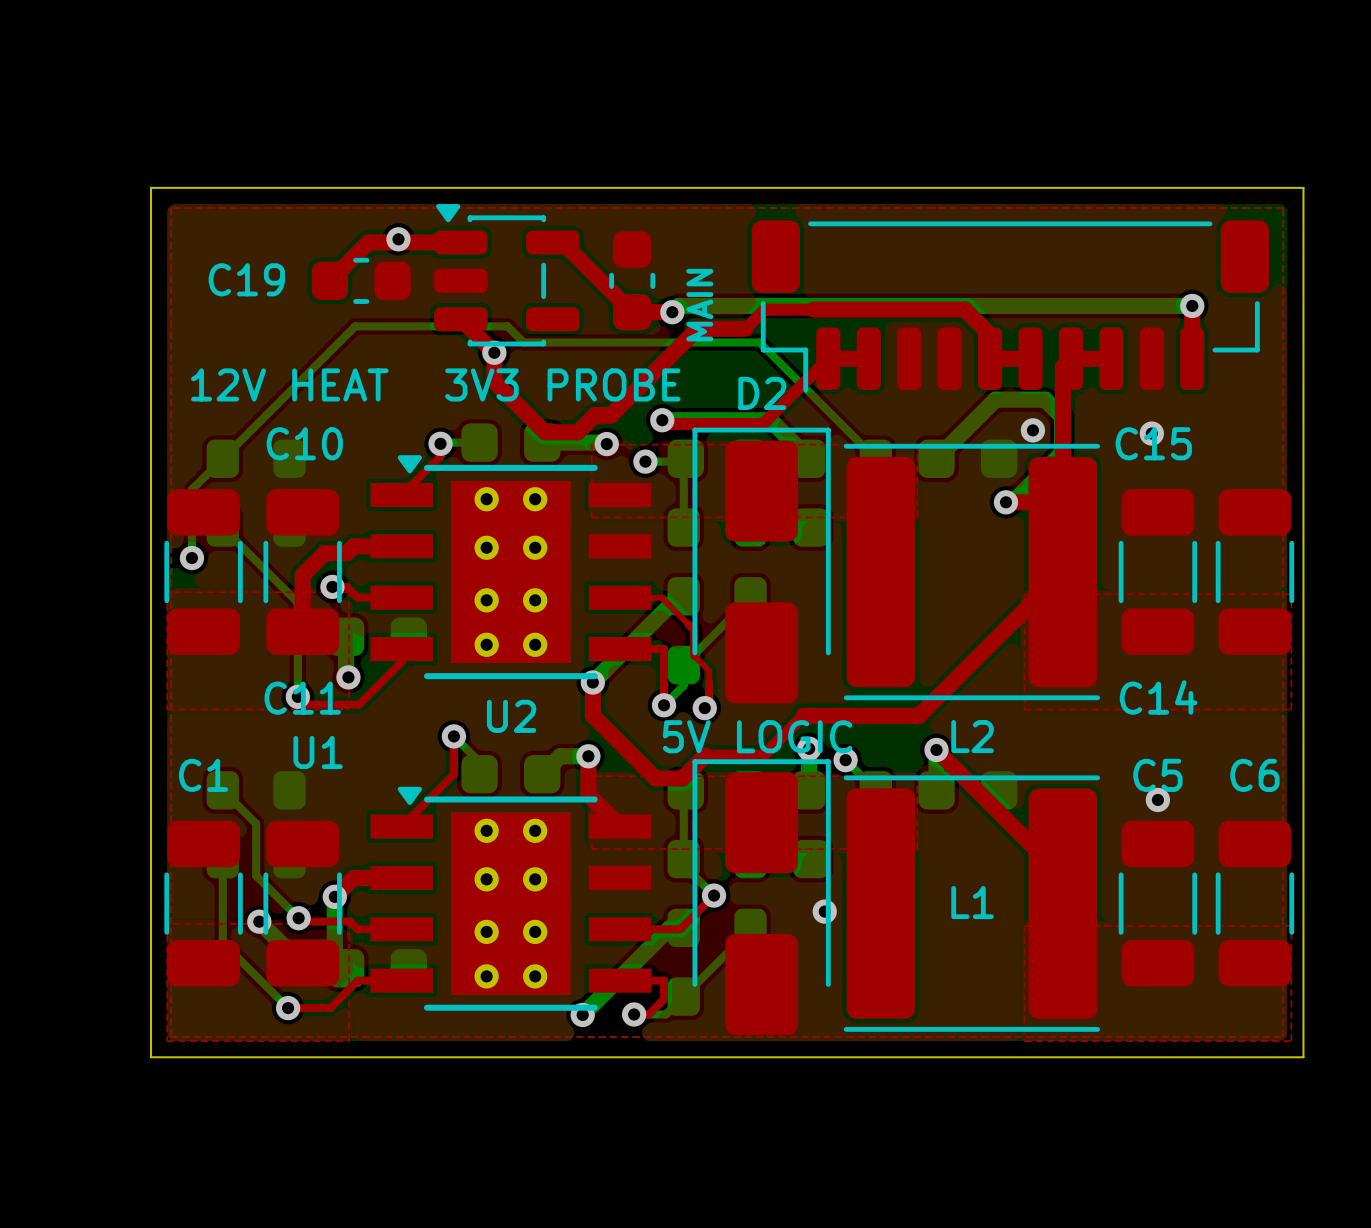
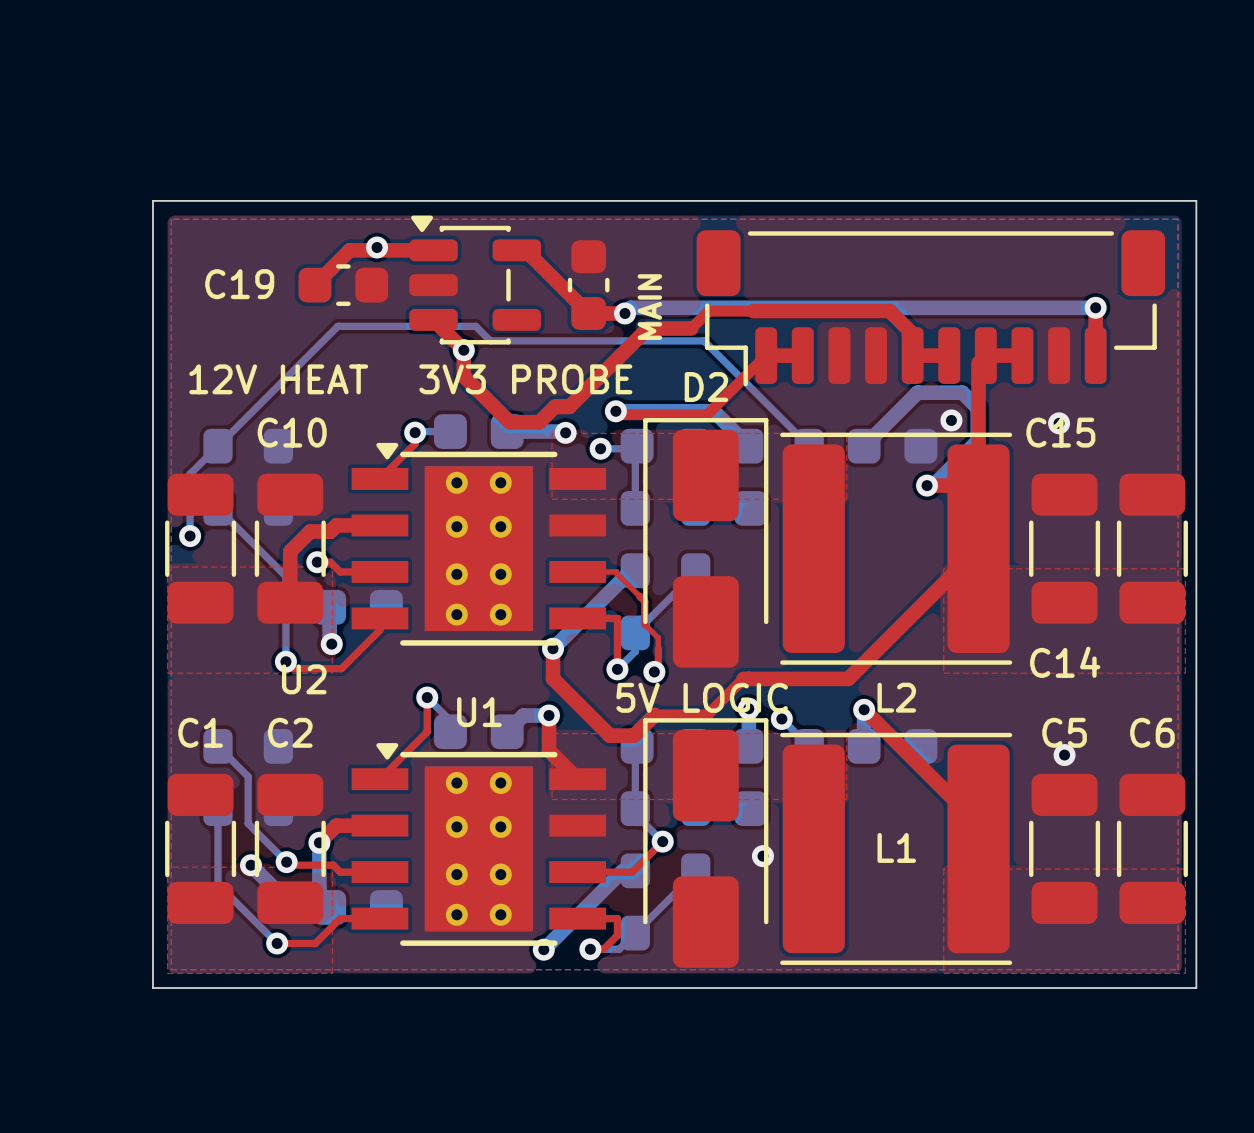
C11 name: C11 (302, 698) -> none
U2 name position: U2 (511, 716) -> U2 (304, 679)
U1 name position: U1 (318, 752) -> U1 (479, 712)
C2 name: none -> C2 (290, 732)

